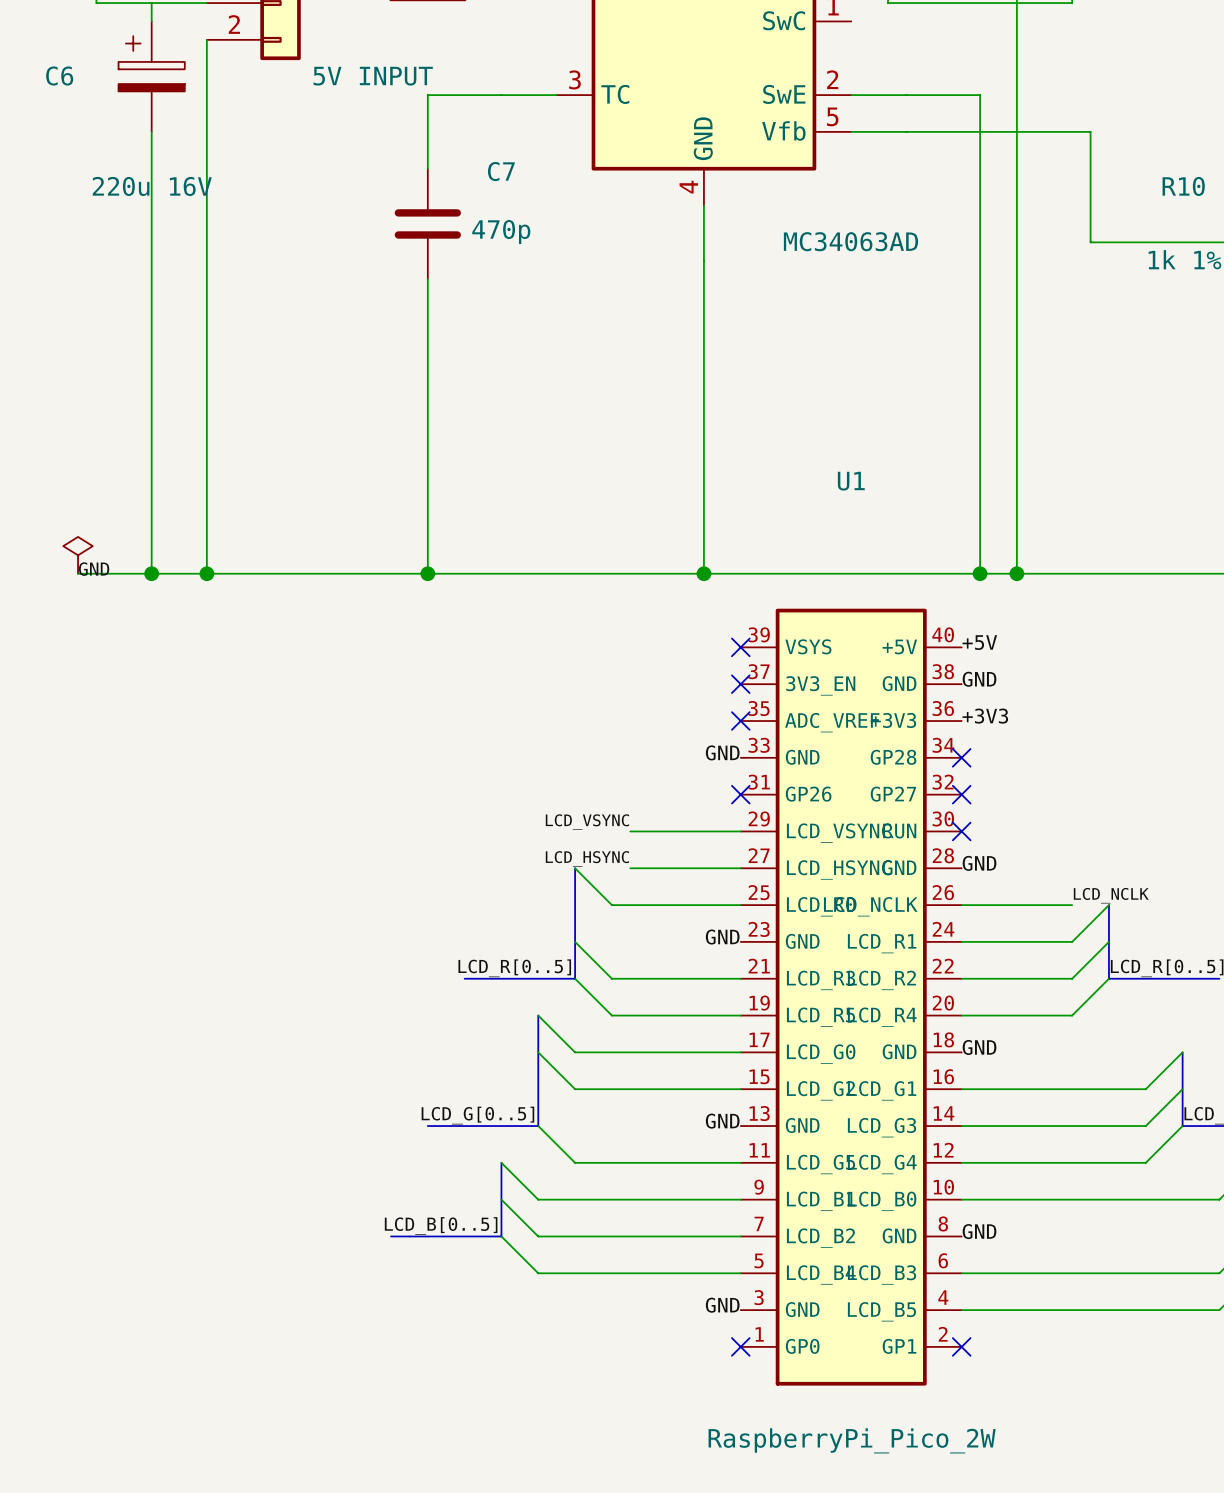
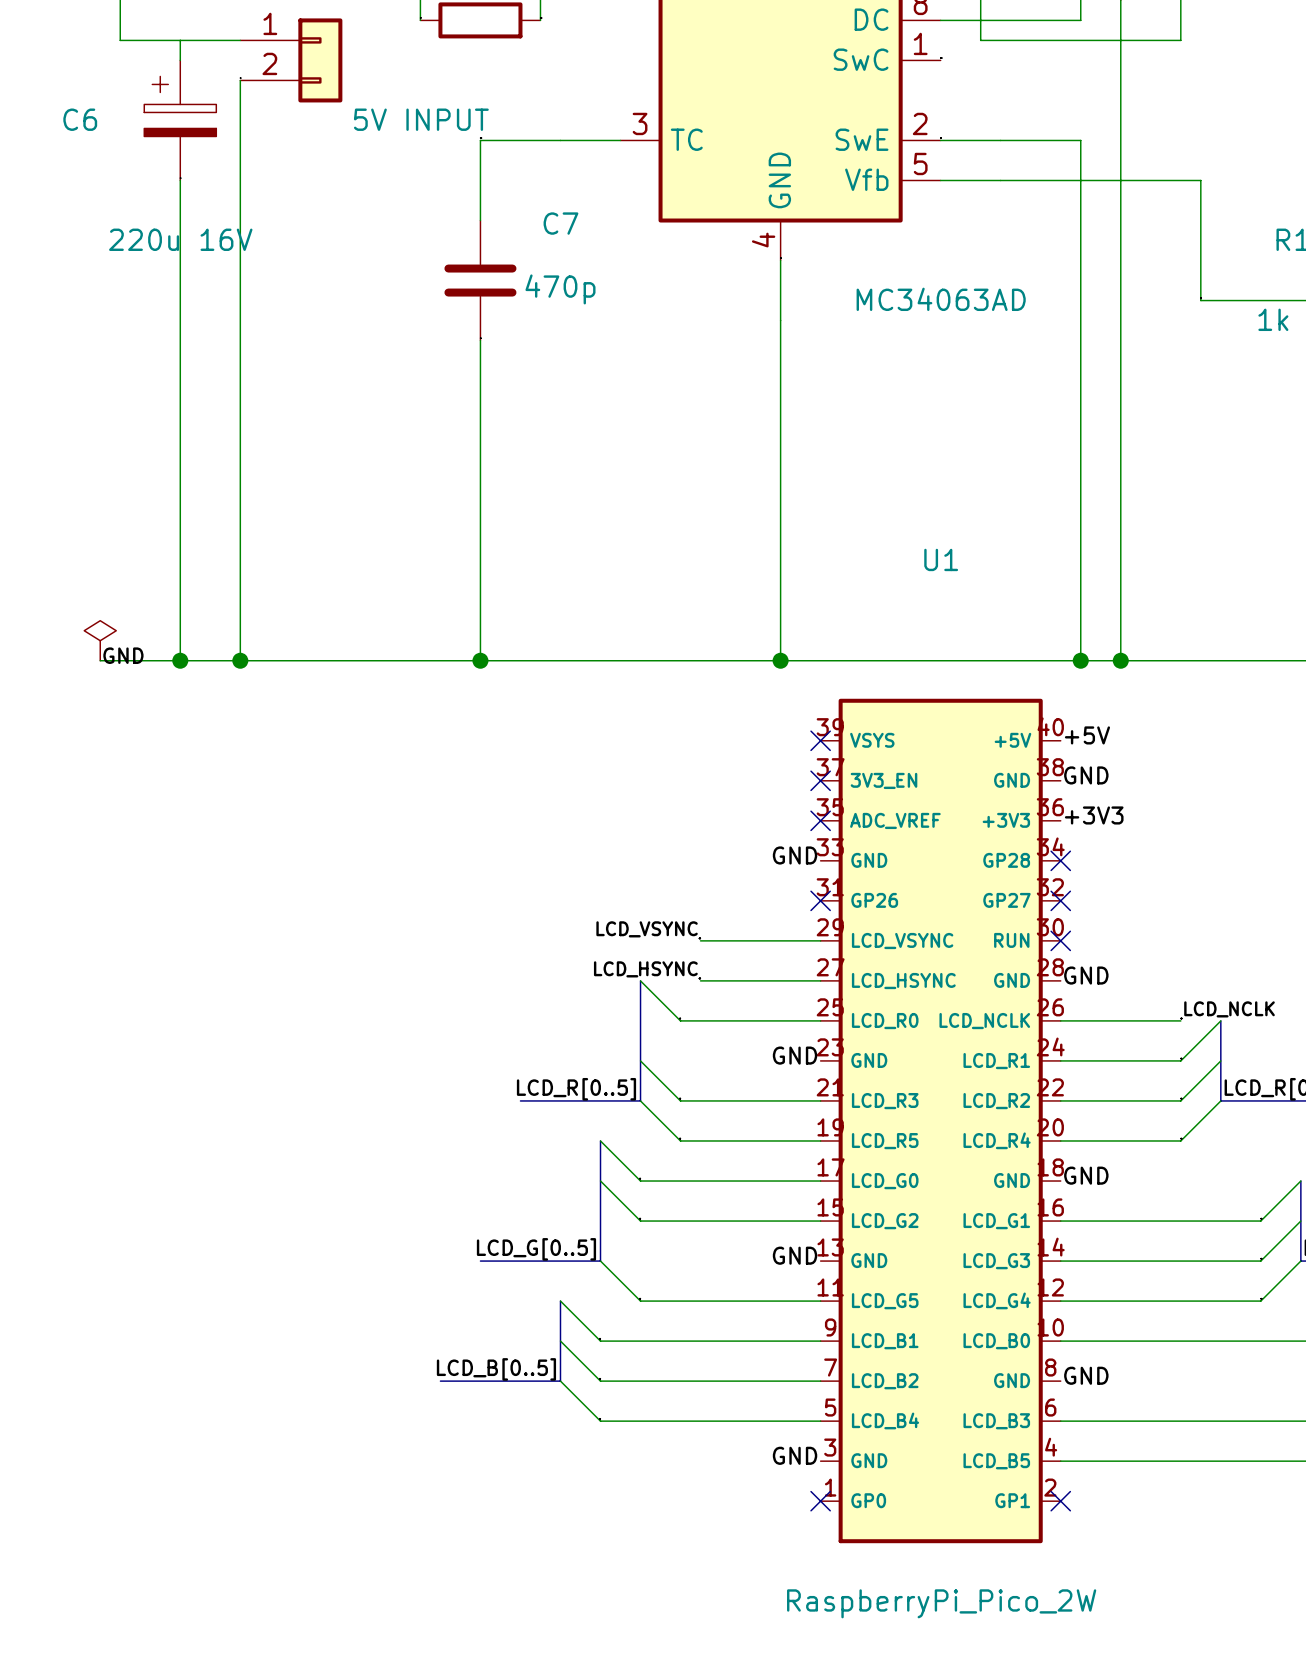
U1 symbol: [740, 608, 962, 1386] -> [820, 698, 1061, 1544]

